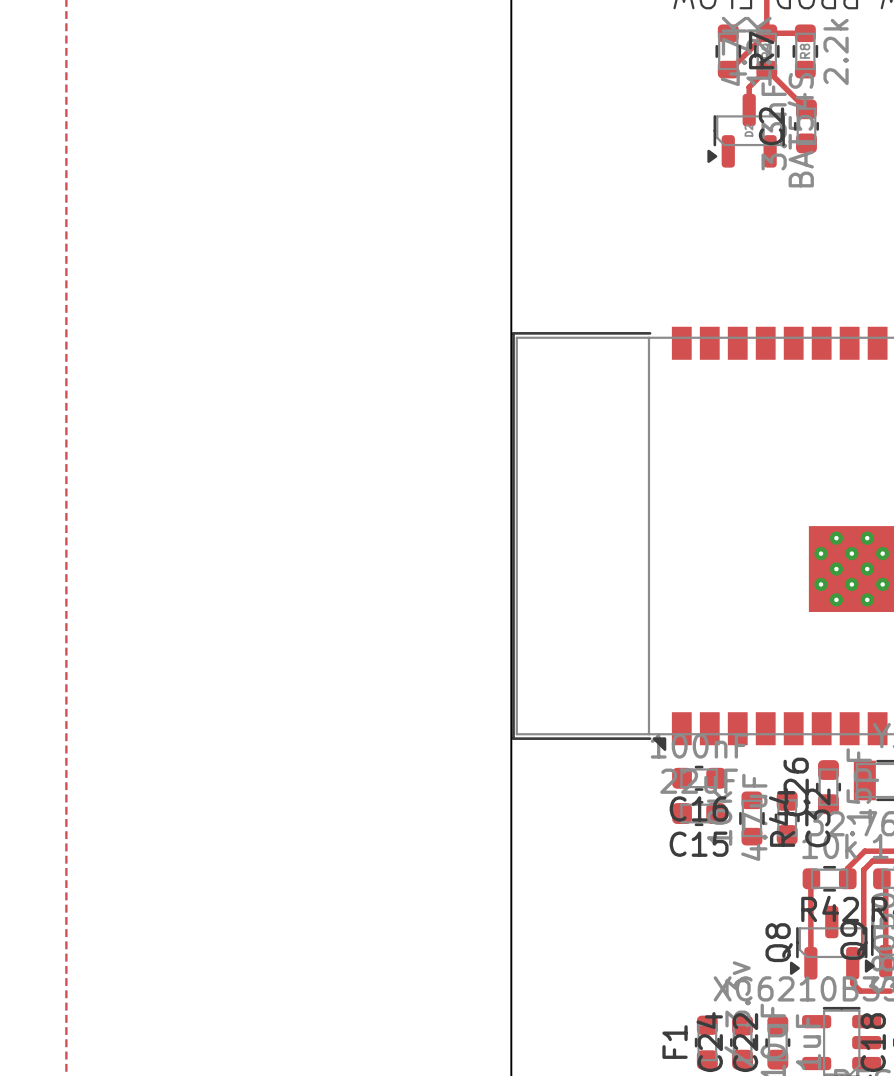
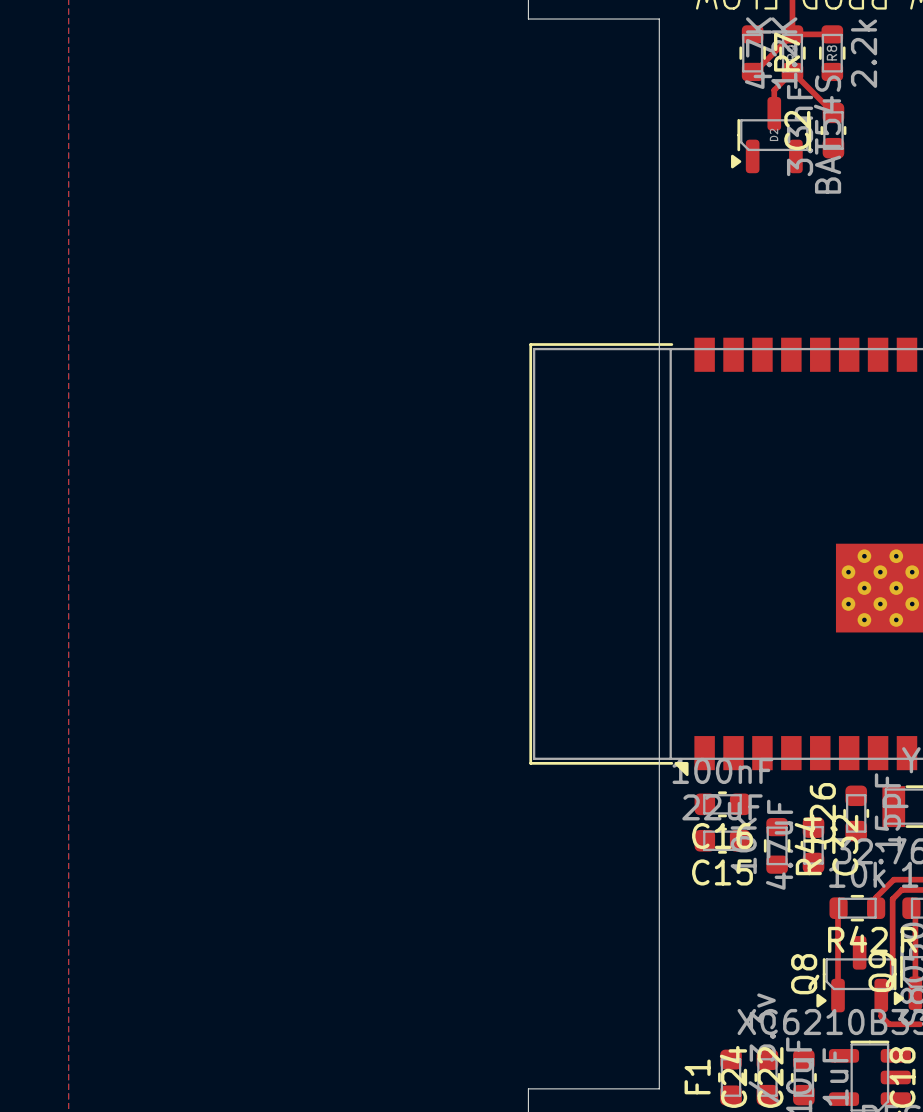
board edge: (511, 18) (511, 1053) -> (528, 19) (659, 19) (659, 1088) (528, 1088)

